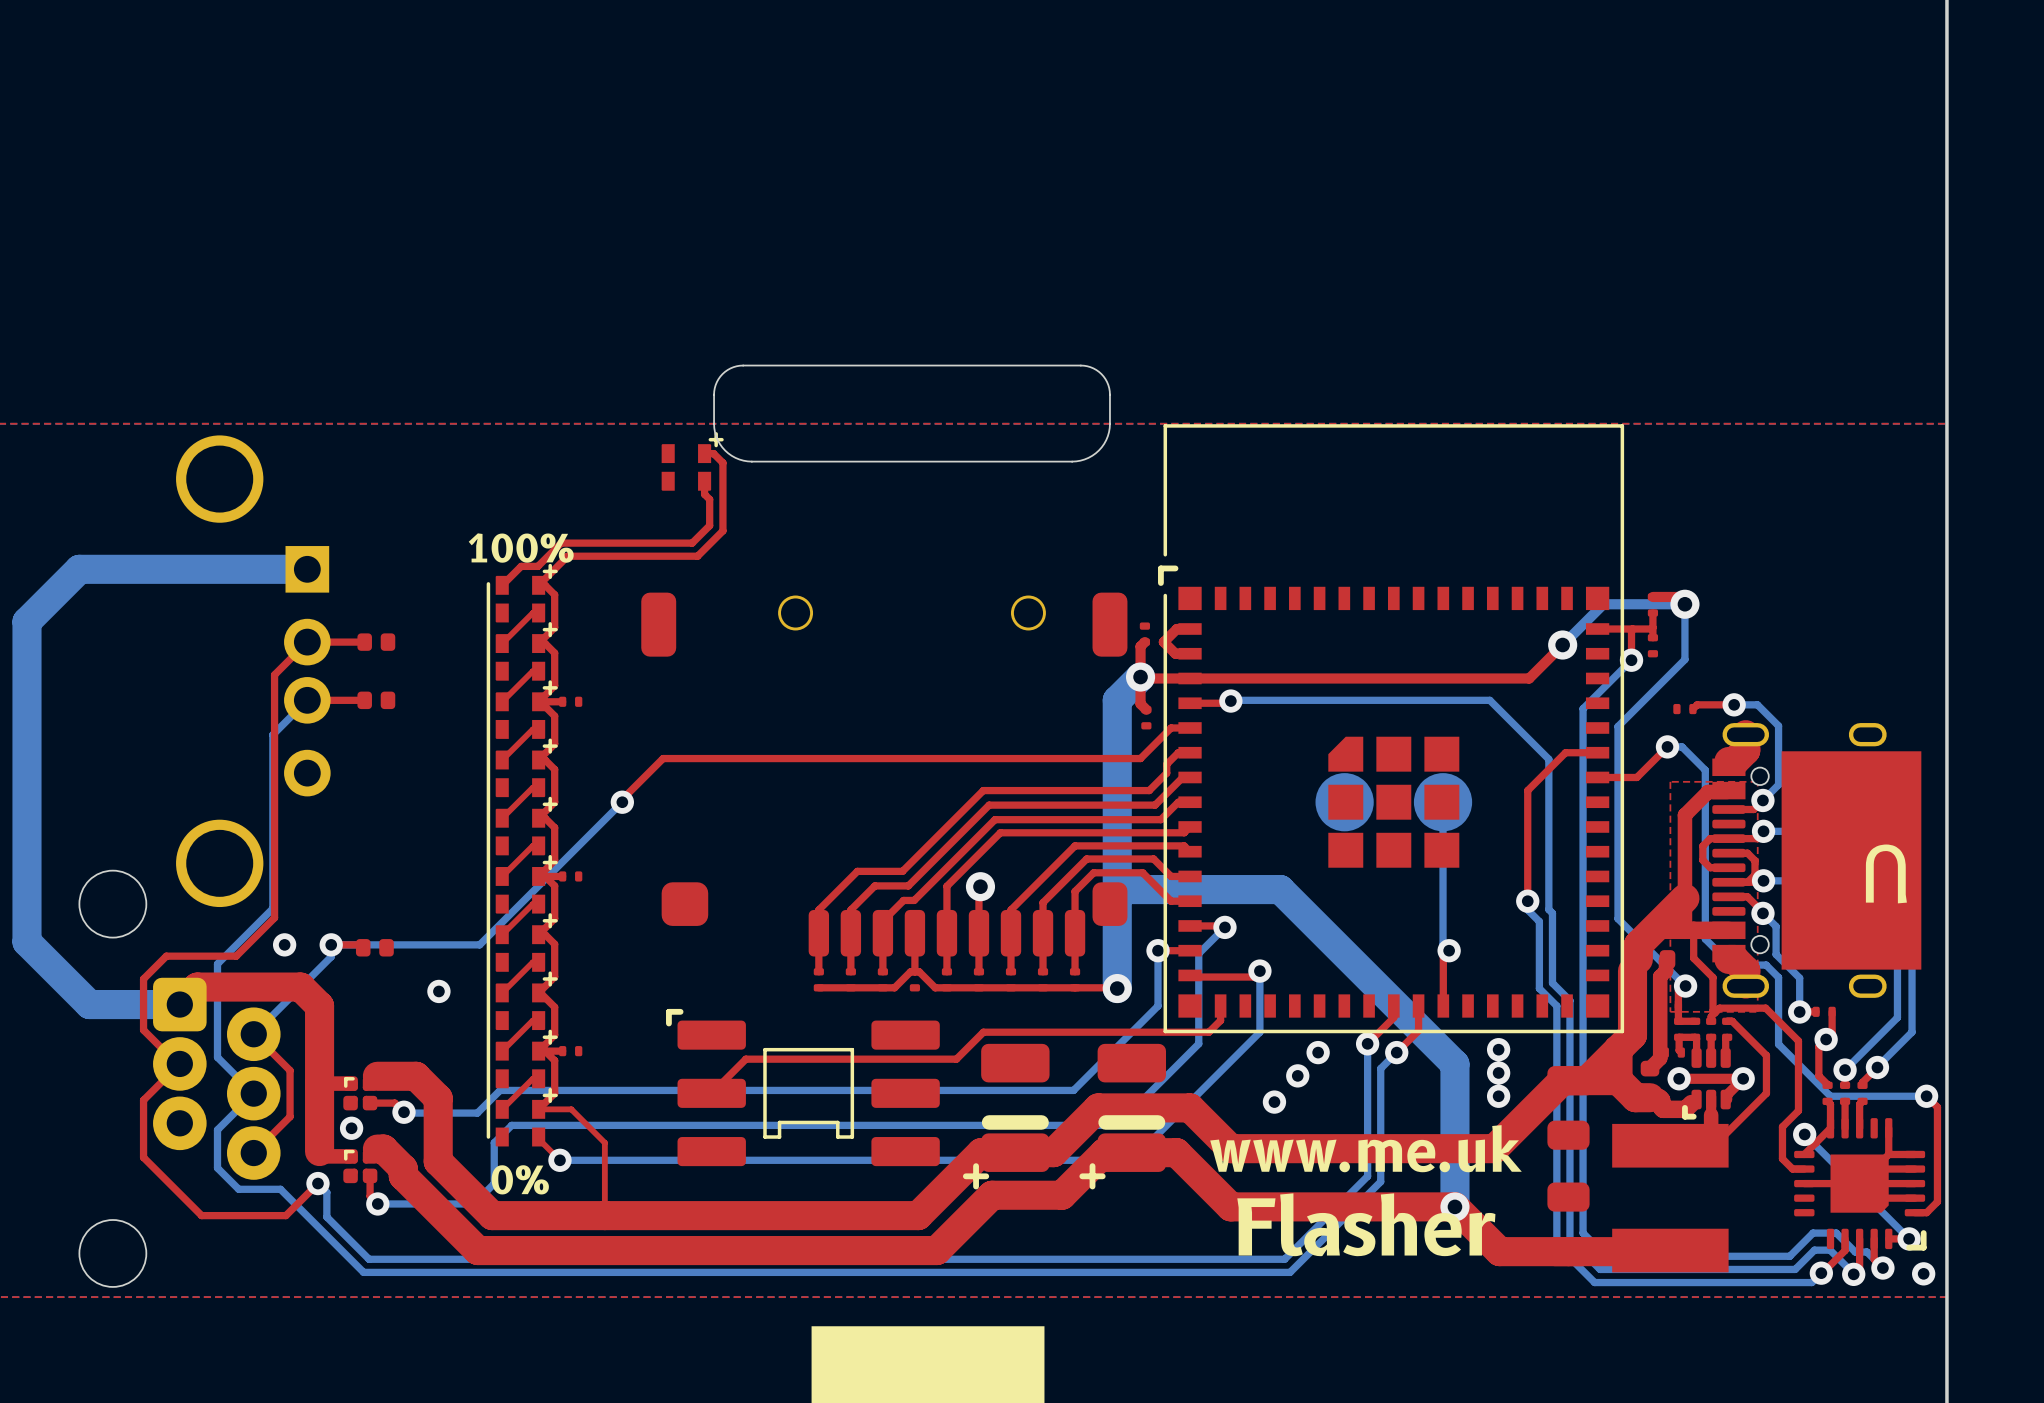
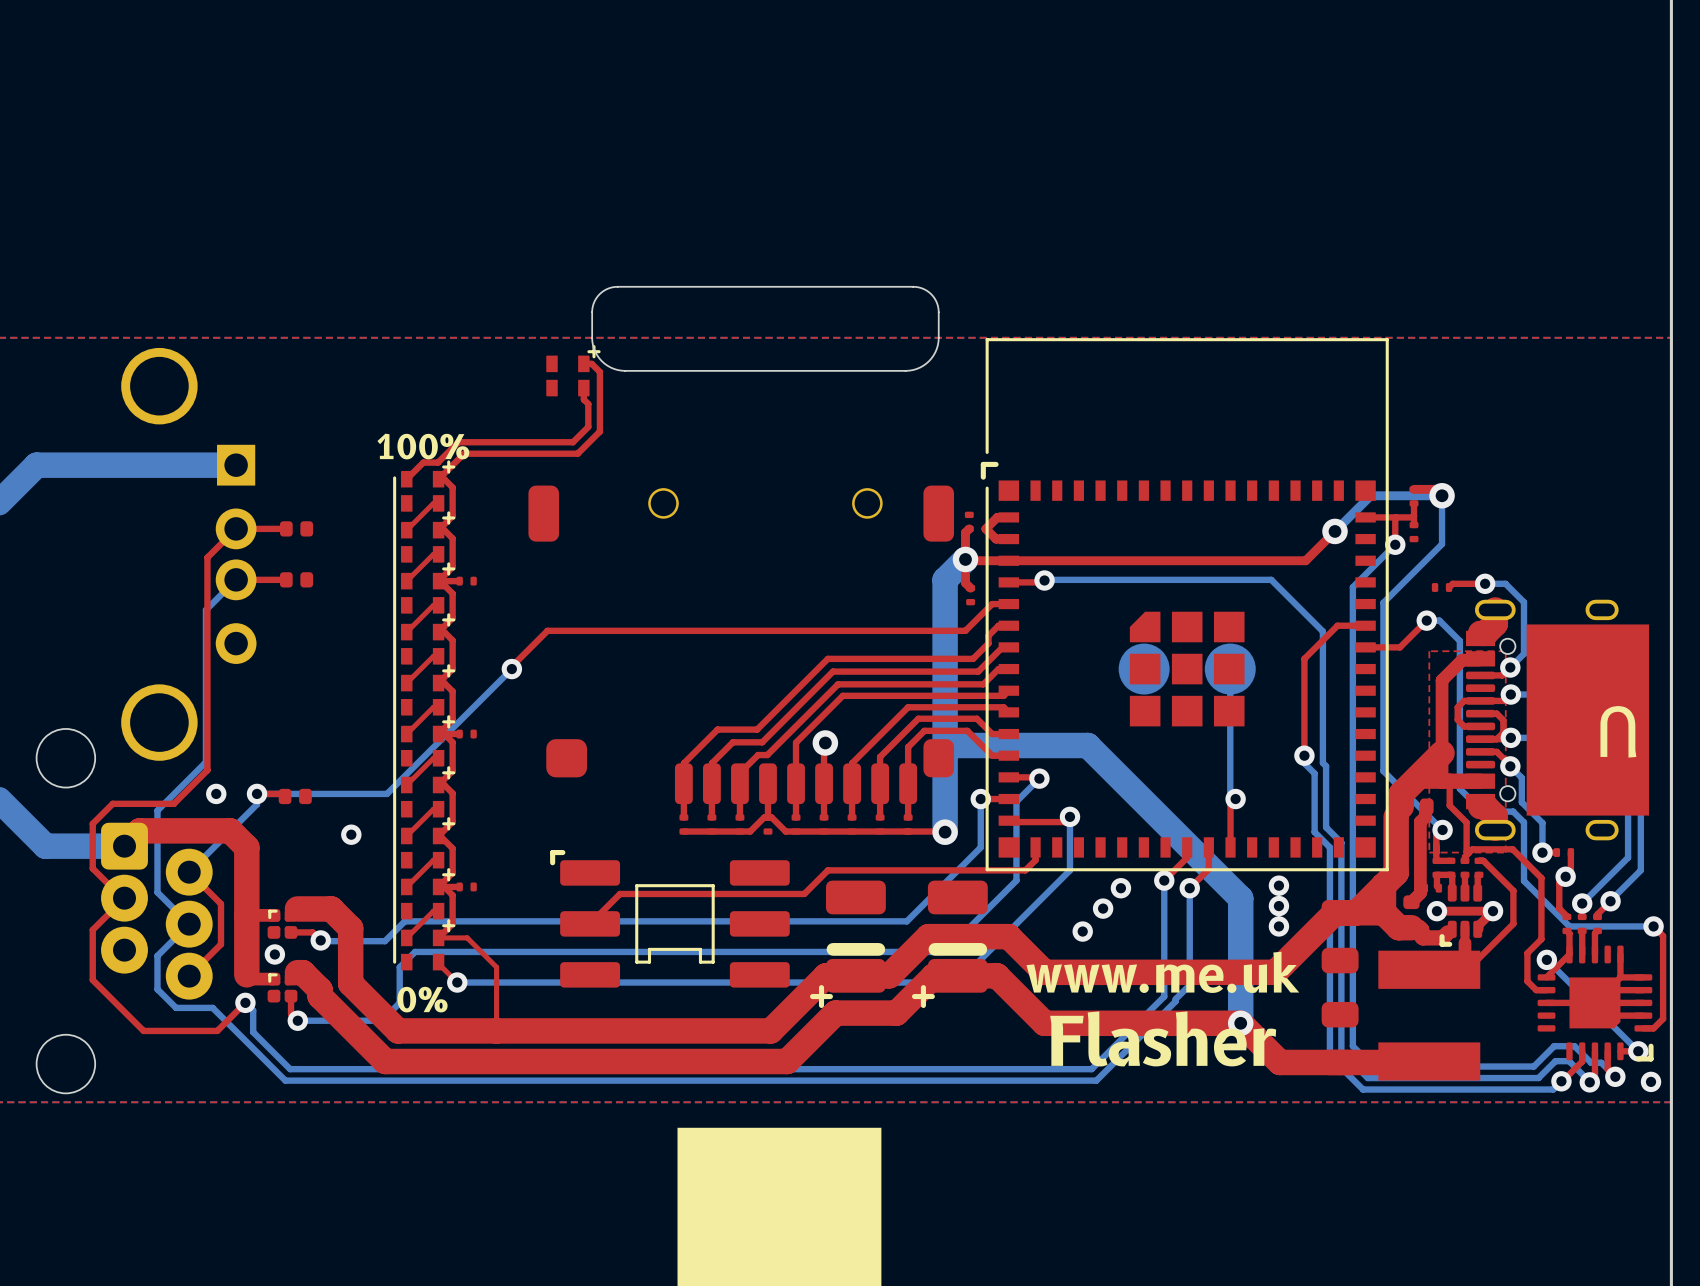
bottom track: (1396, 1052) (1380, 1068) (1380, 1179) -> (1189, 888) (1189, 985) (1175, 999)

